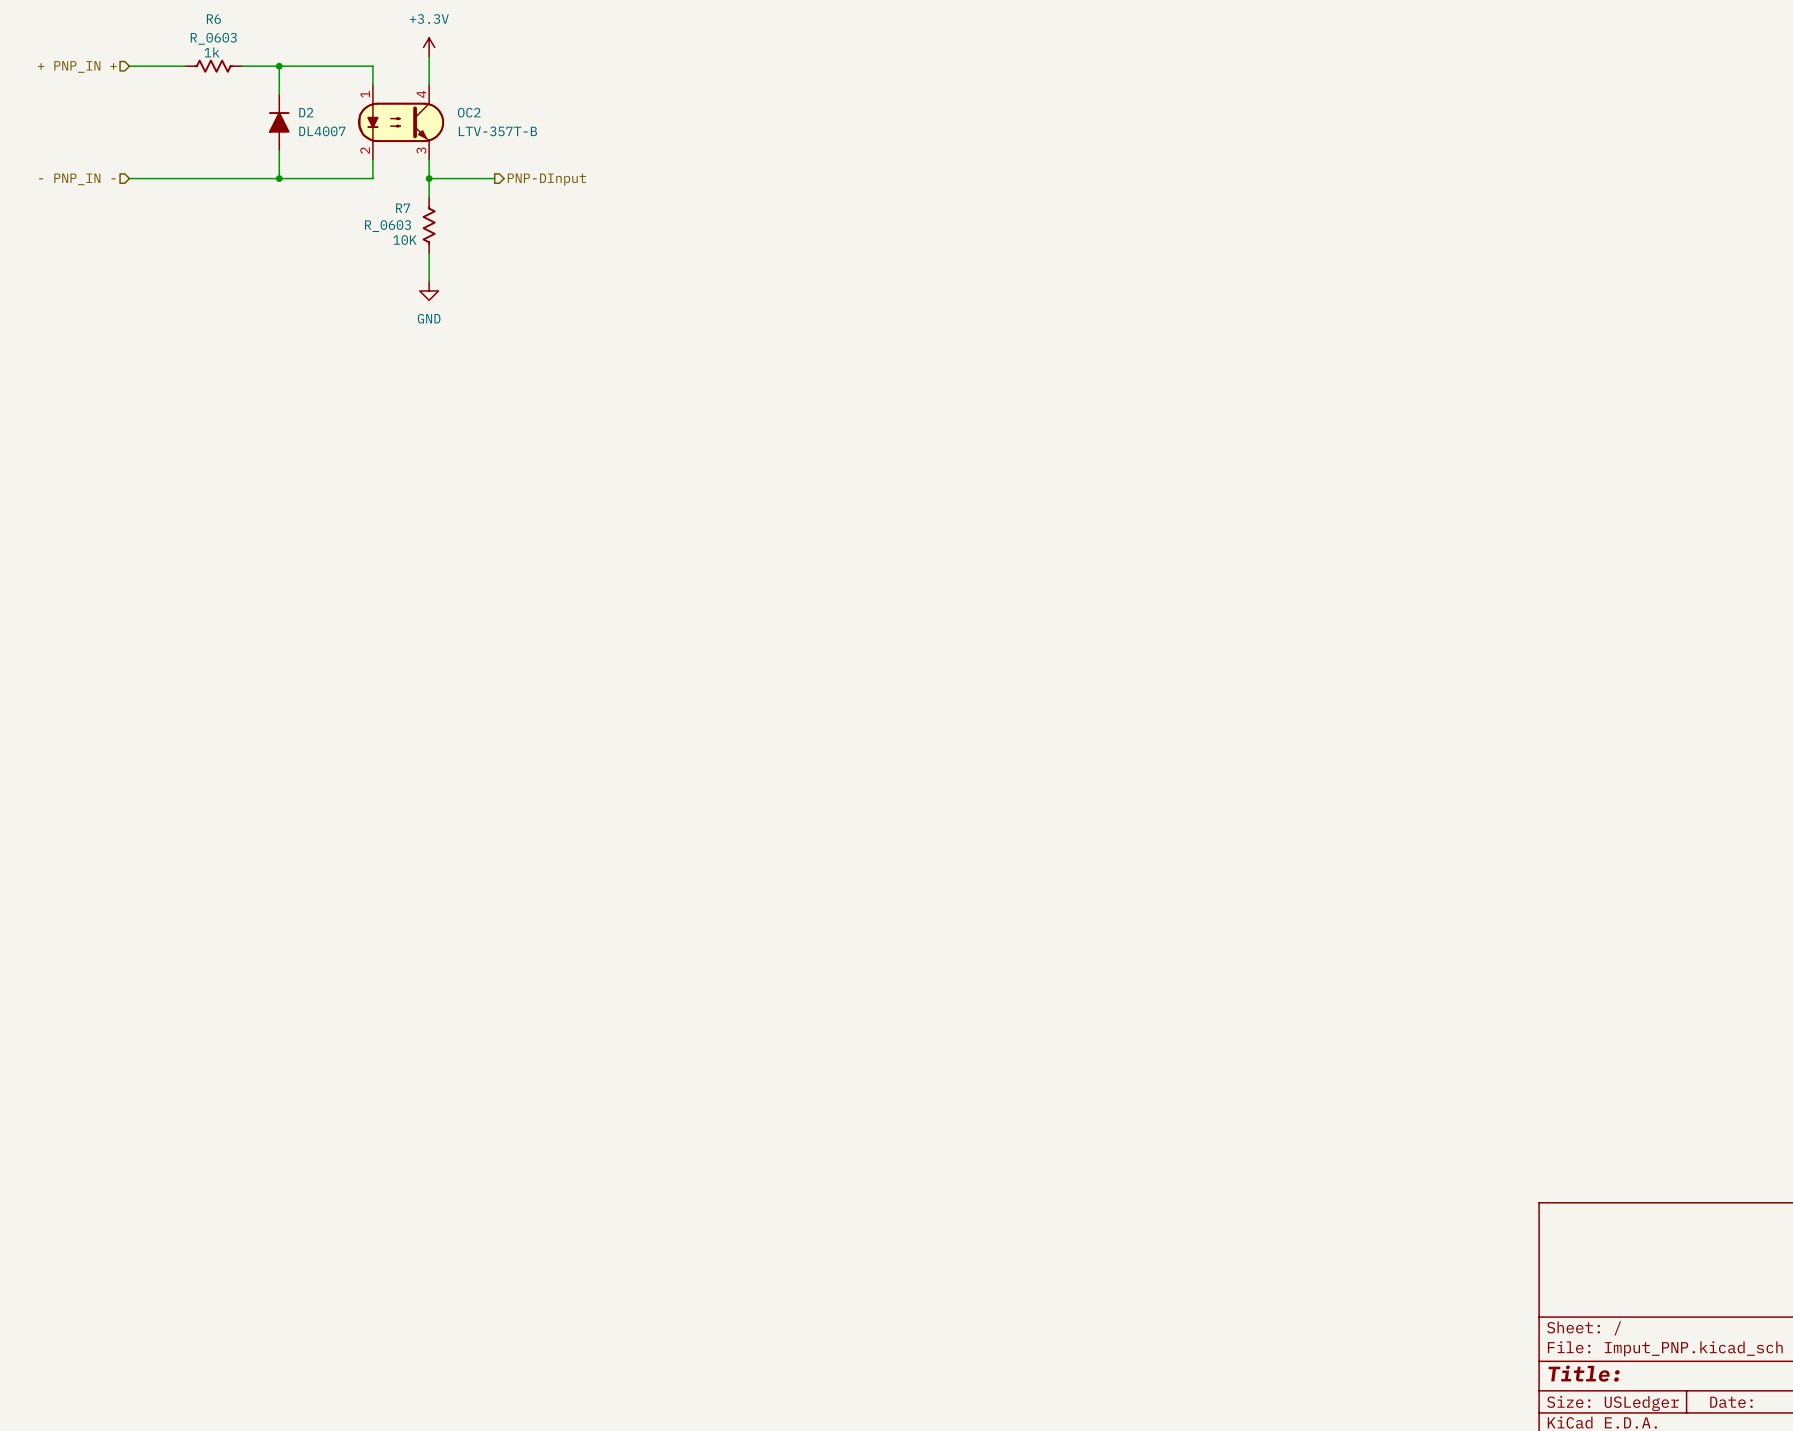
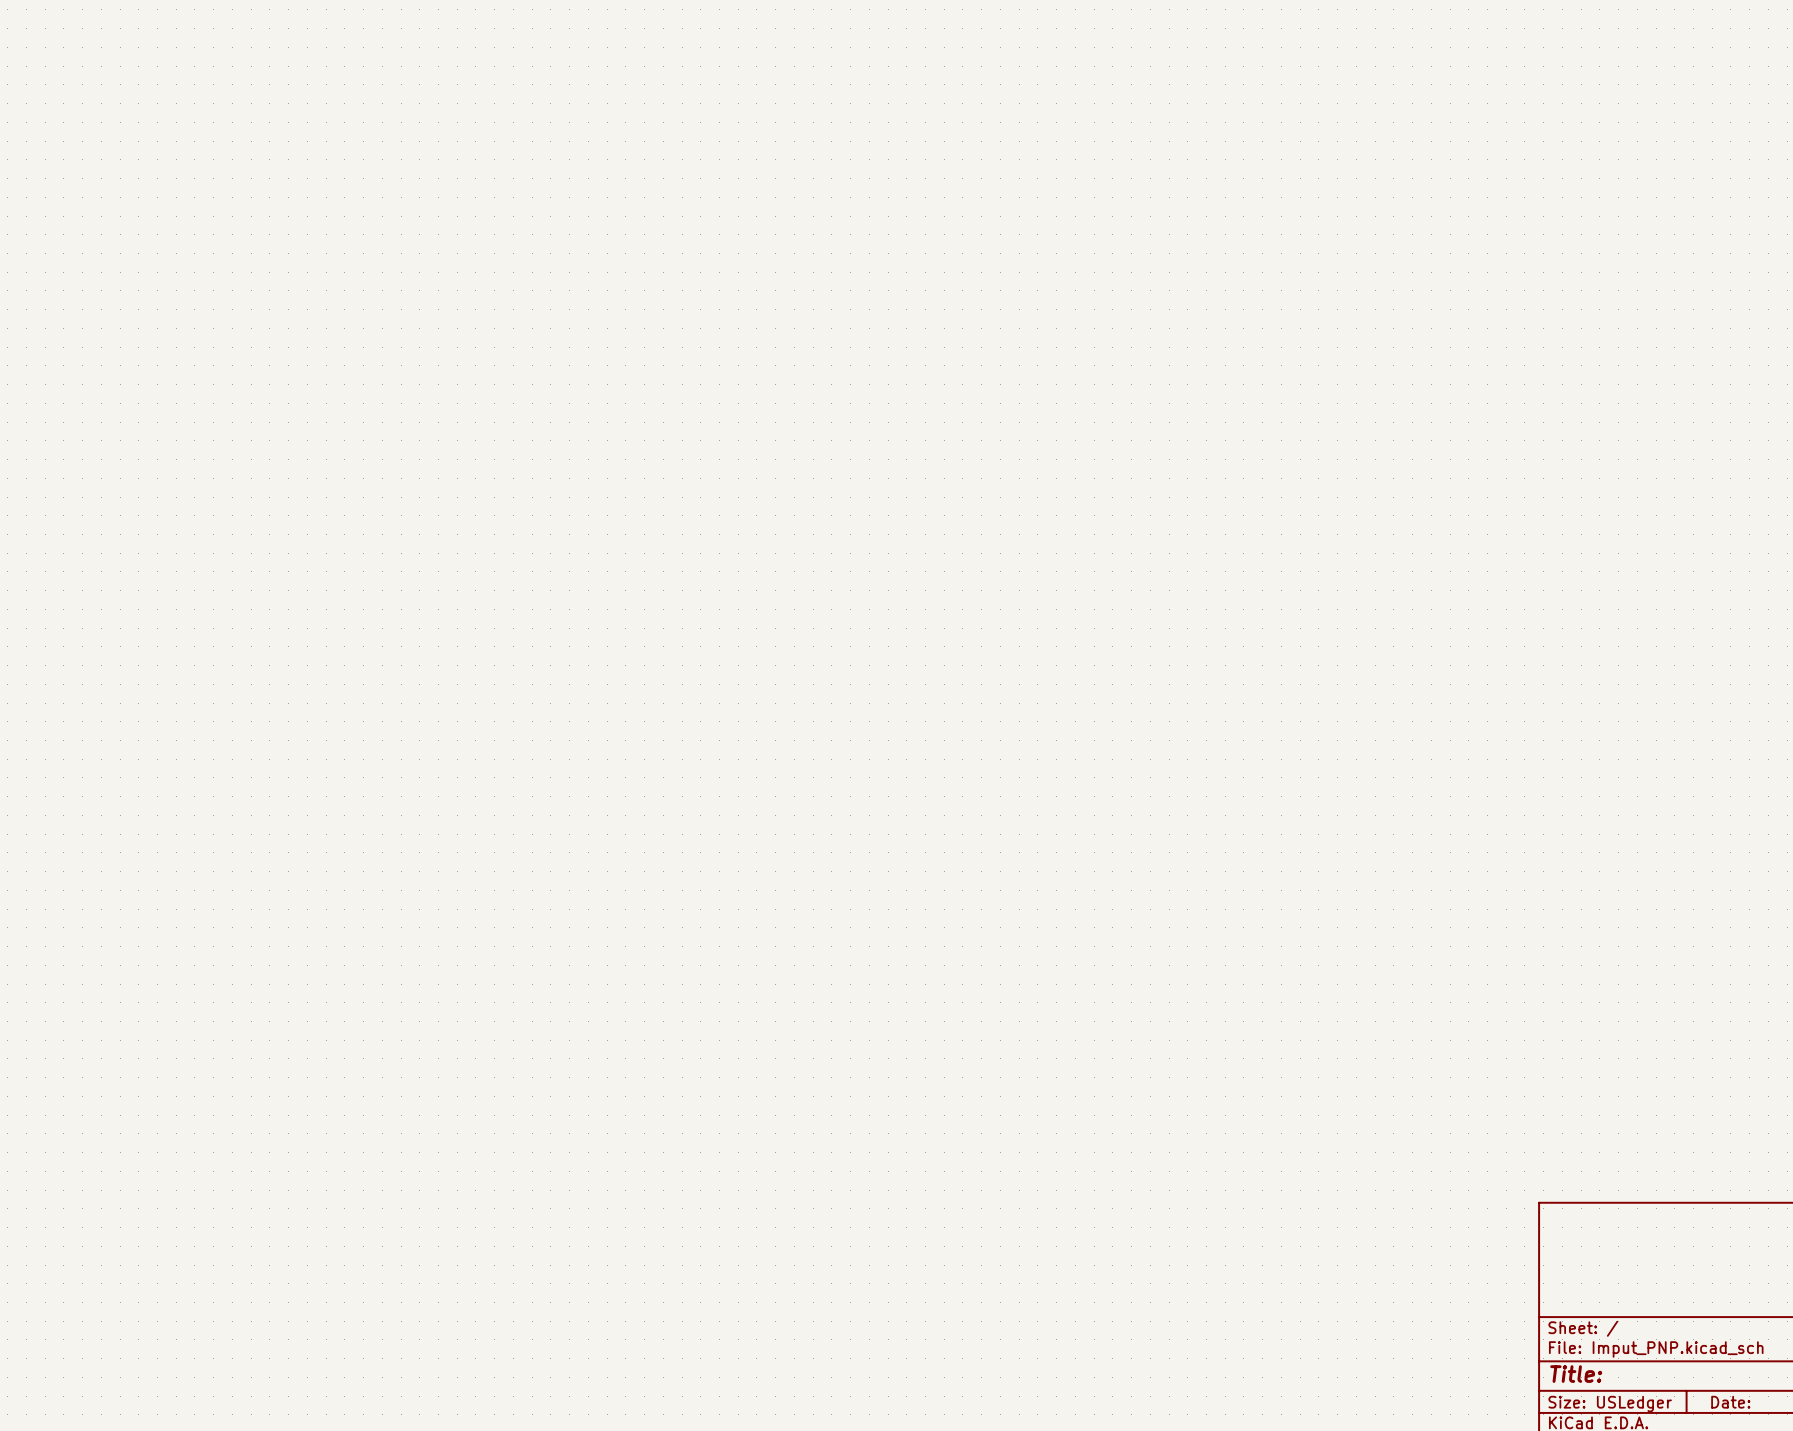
power symbol: +3.3V (429, 47) -> none
wire: (429, 56) (429, 84) -> none
hierarchical label: + PNP_IN + (77, 66) -> none
wire: (129, 66) (185, 66) -> none
R6: R_0603 (213, 66) -> none
wire: (241, 66) (372, 66) (372, 84) -> none
wire: (279, 66) (279, 94) -> none
junction: (279, 66) -> none
D2: DL4007 (279, 122) -> none
OC2: LTV-357T-B (401, 122) -> none
wire: (279, 150) (279, 178) -> none
wire: (372, 159) (372, 178) (129, 178) -> none
wire: (429, 159) (429, 197) -> none
junction: (279, 178) -> none
wire: (429, 178) (494, 178) -> none
junction: (429, 178) -> none
hierarchical label: - PNP_IN - (77, 179) -> none
hierarchical label: PNP-DInput (546, 179) -> none
R7: R_0603 (429, 225) -> none
wire: (429, 253) (429, 281) -> none
power symbol: GND (429, 290) -> none

